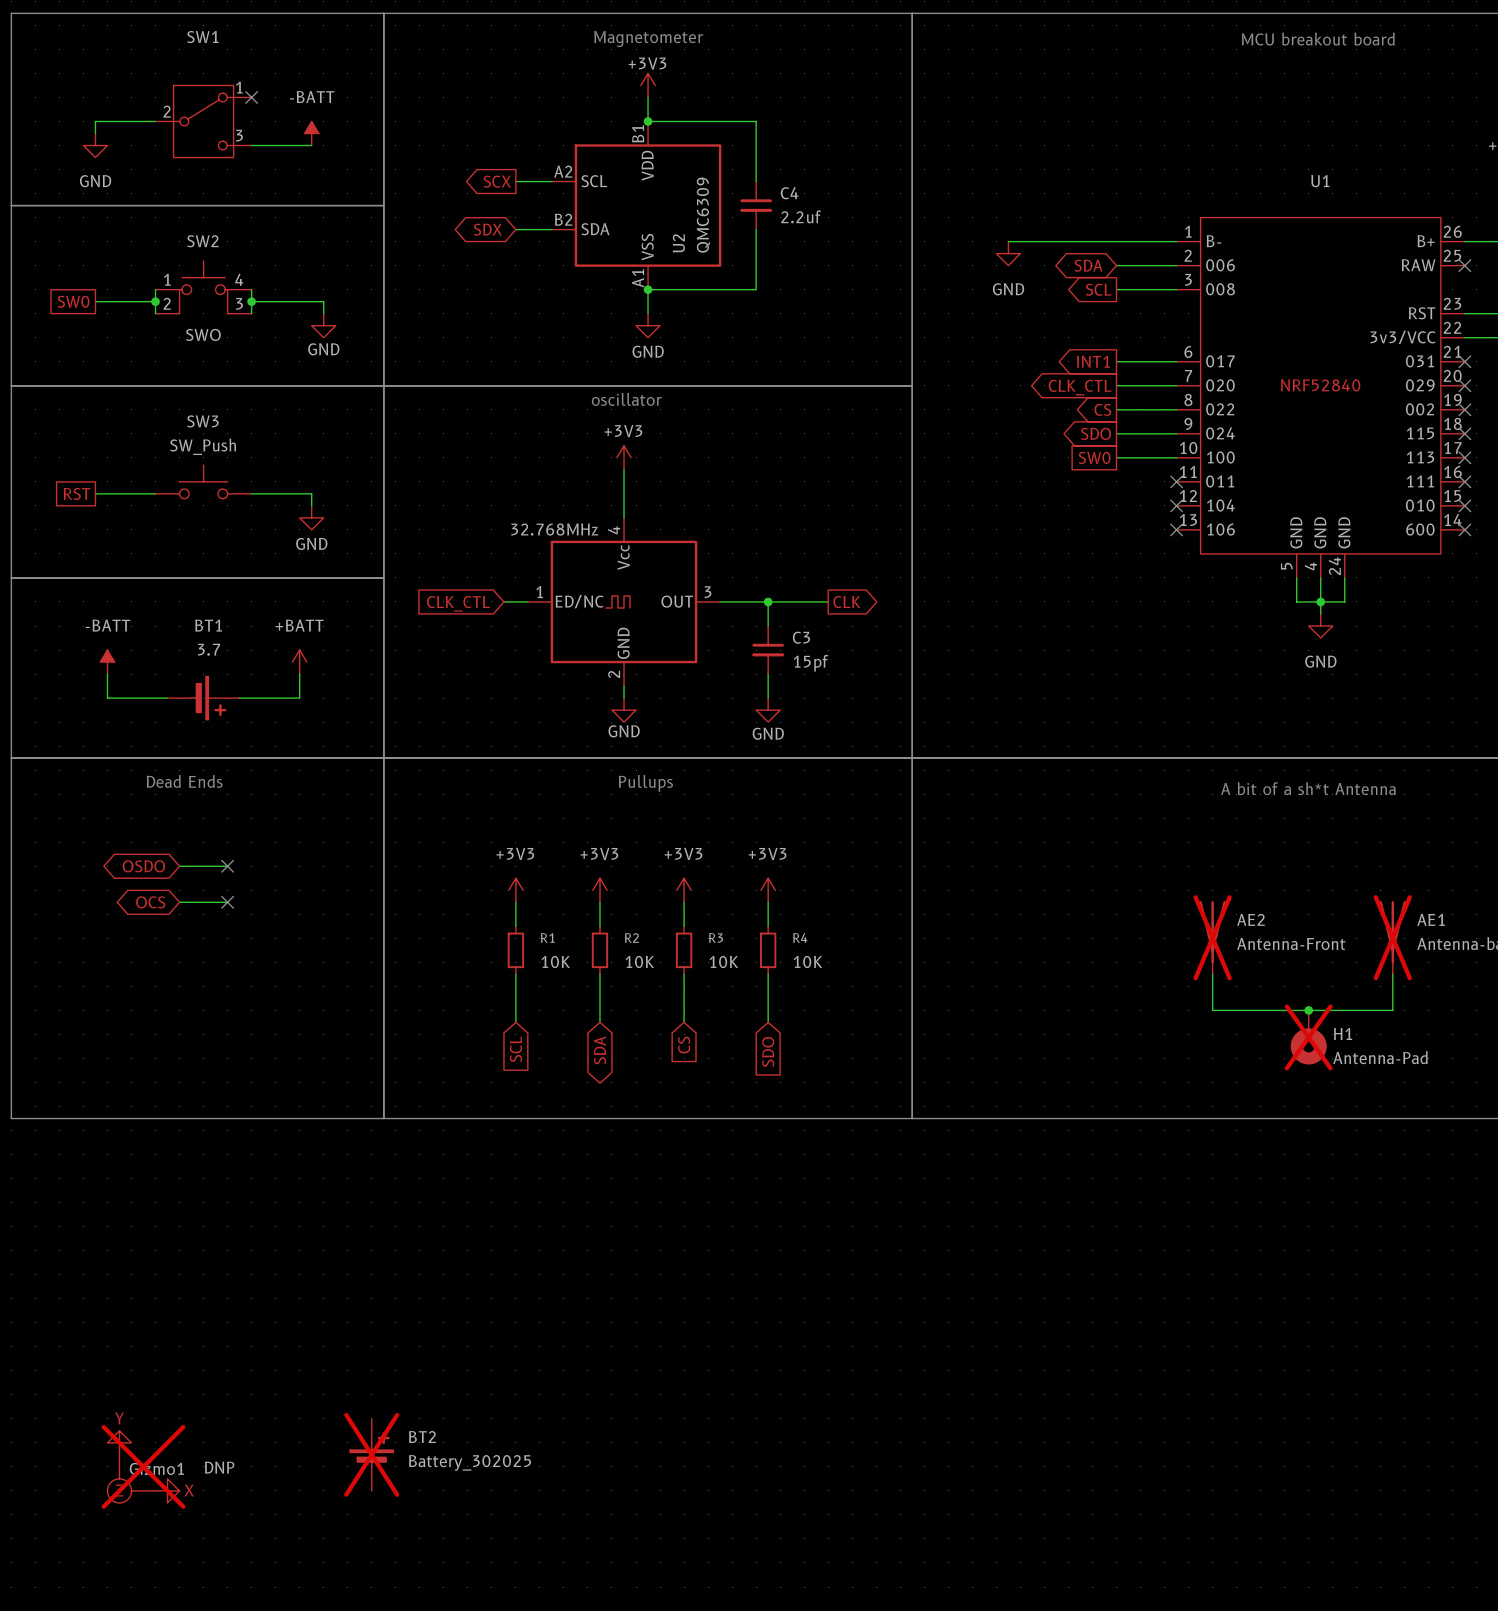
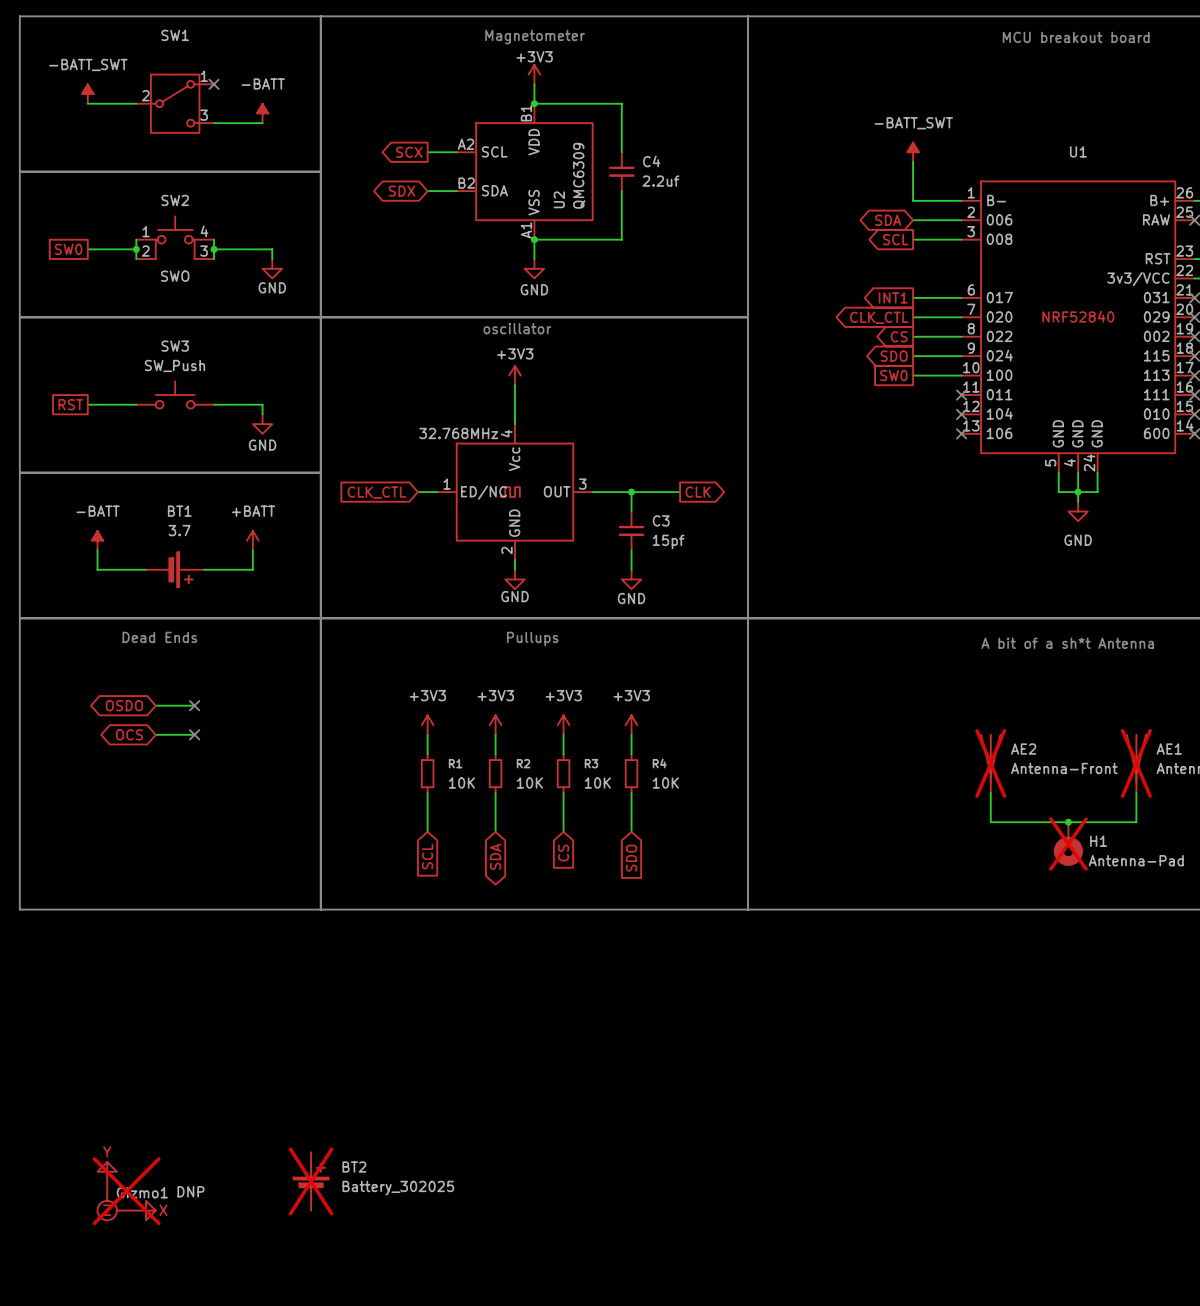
power symbol: none -> -BATT_SWT (87, 94)
wire: (95, 121) (95, 133) -> none
power symbol: GND (95, 145) -> none
power symbol: none -> -BATT_SWT (913, 152)
wire: (1008, 241) (1116, 241) -> (913, 161) (913, 200)
power symbol: GND (1008, 253) -> none

